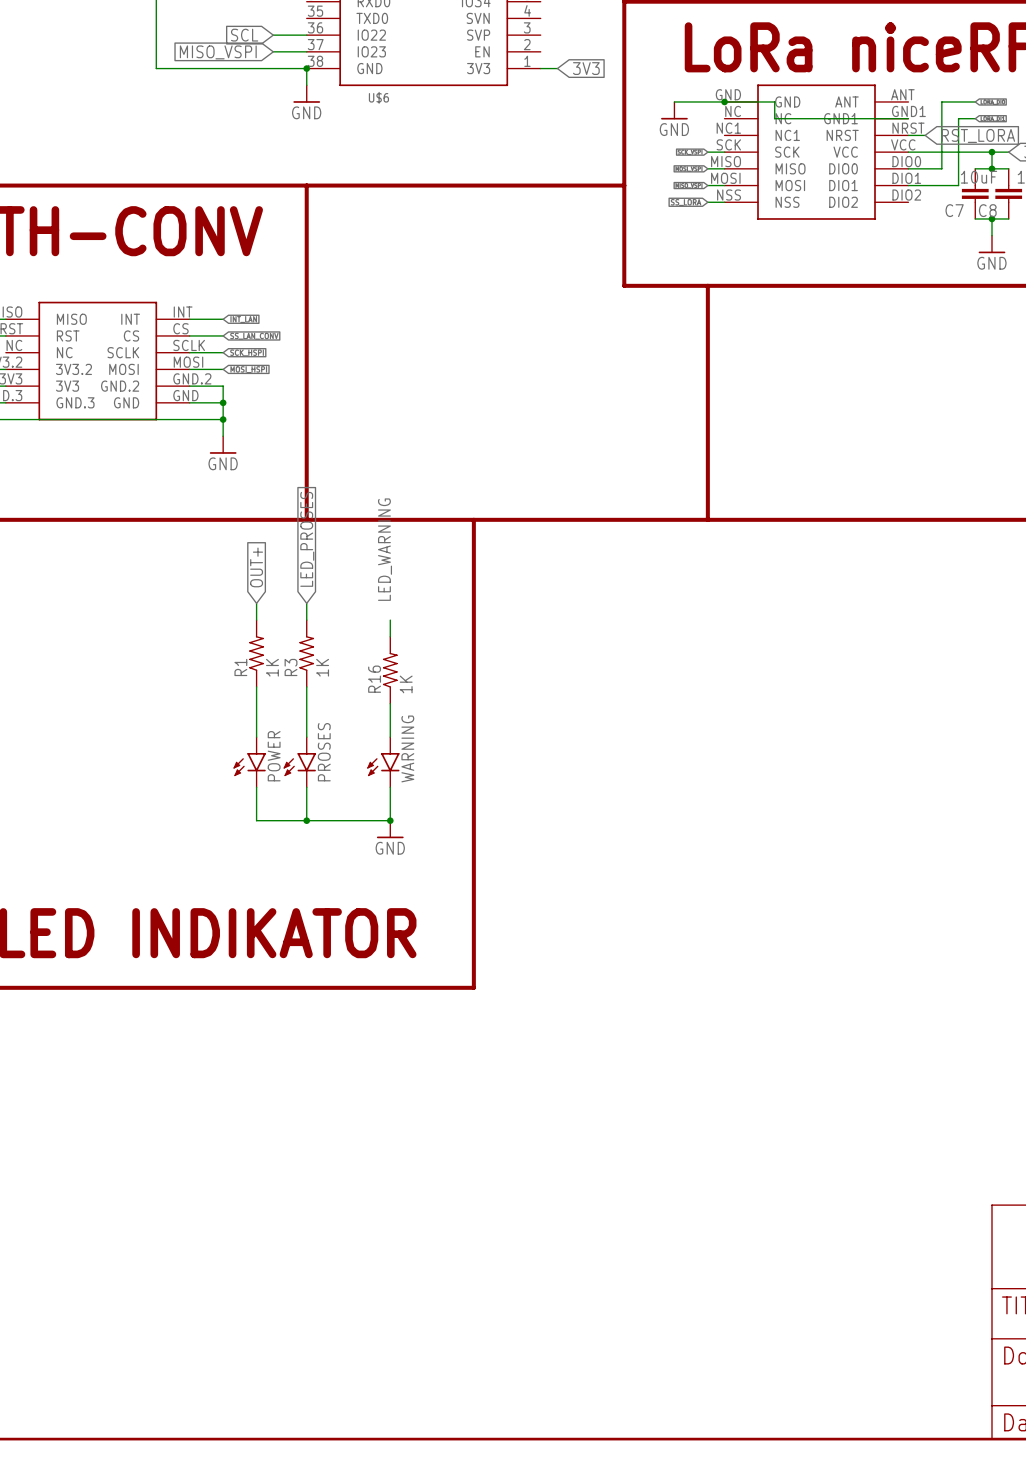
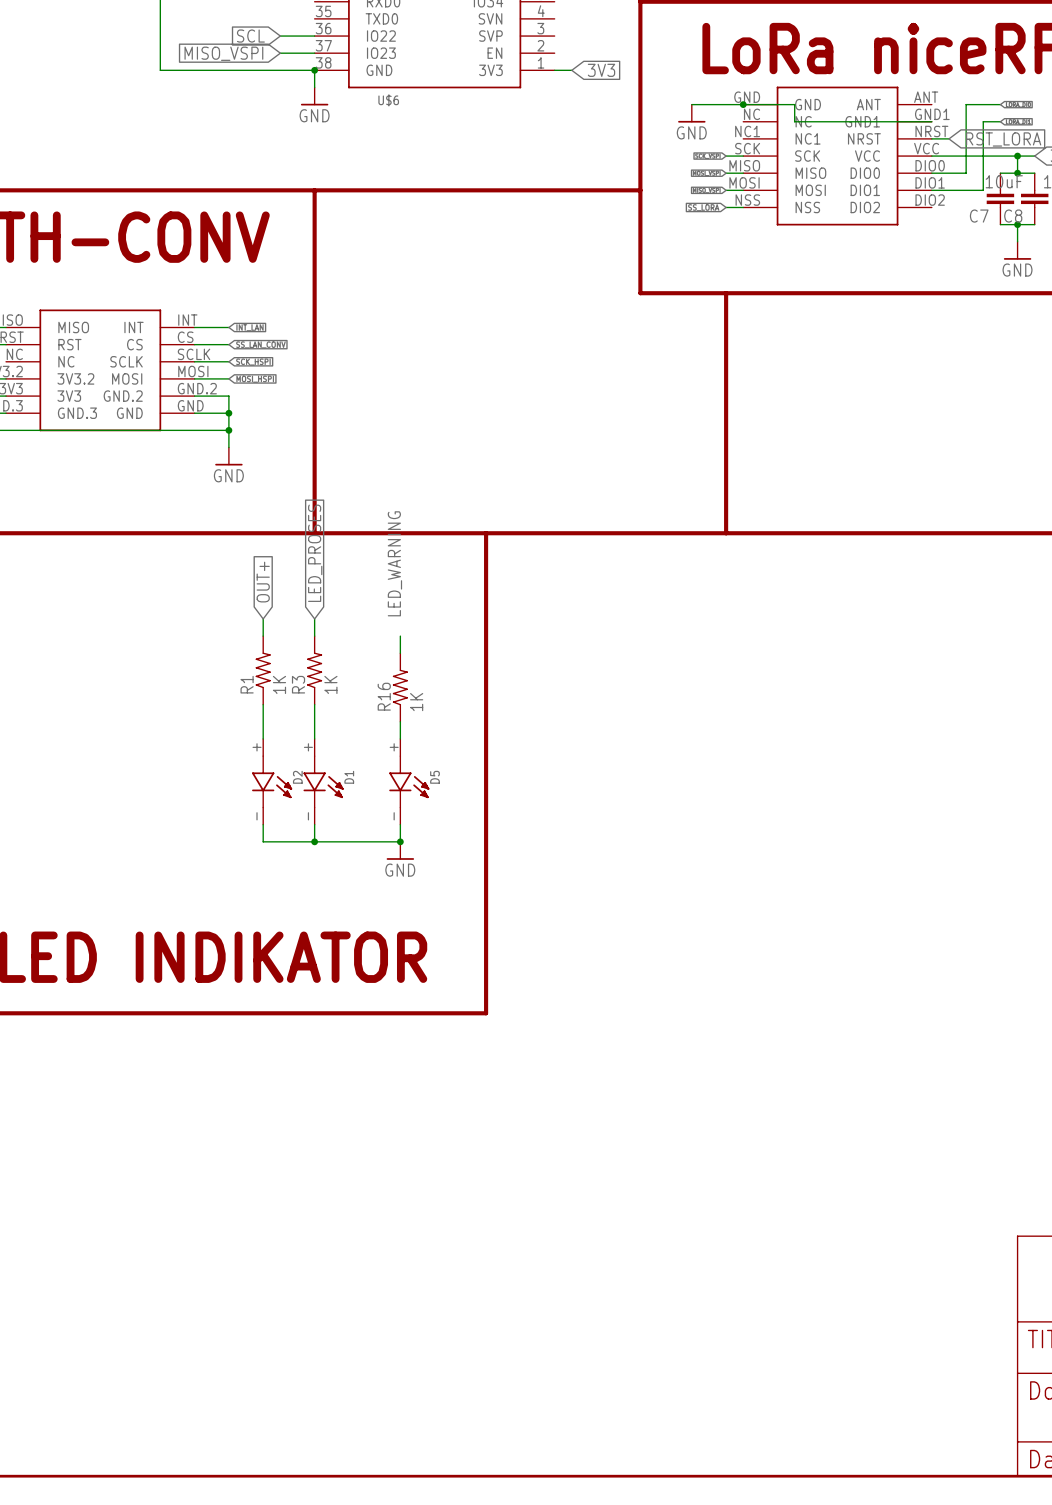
POWER: (249, 762) -> none
D2: none -> (272, 781)
PROSES: (299, 762) -> none
D1: none -> (323, 781)
WARNING: (383, 762) -> none
D5: none -> (409, 781)

